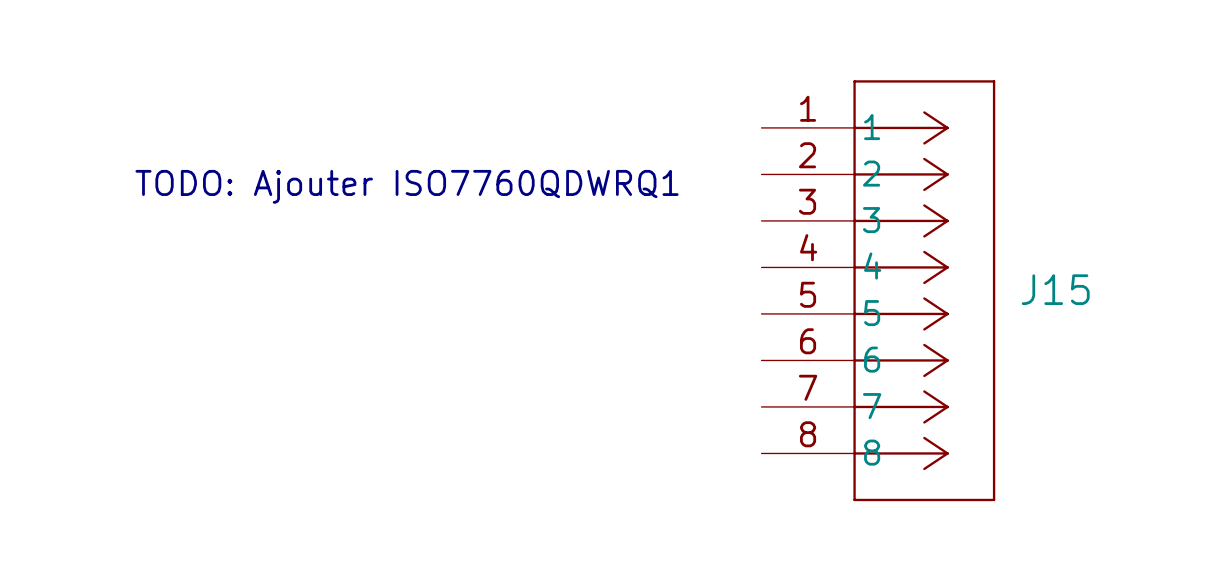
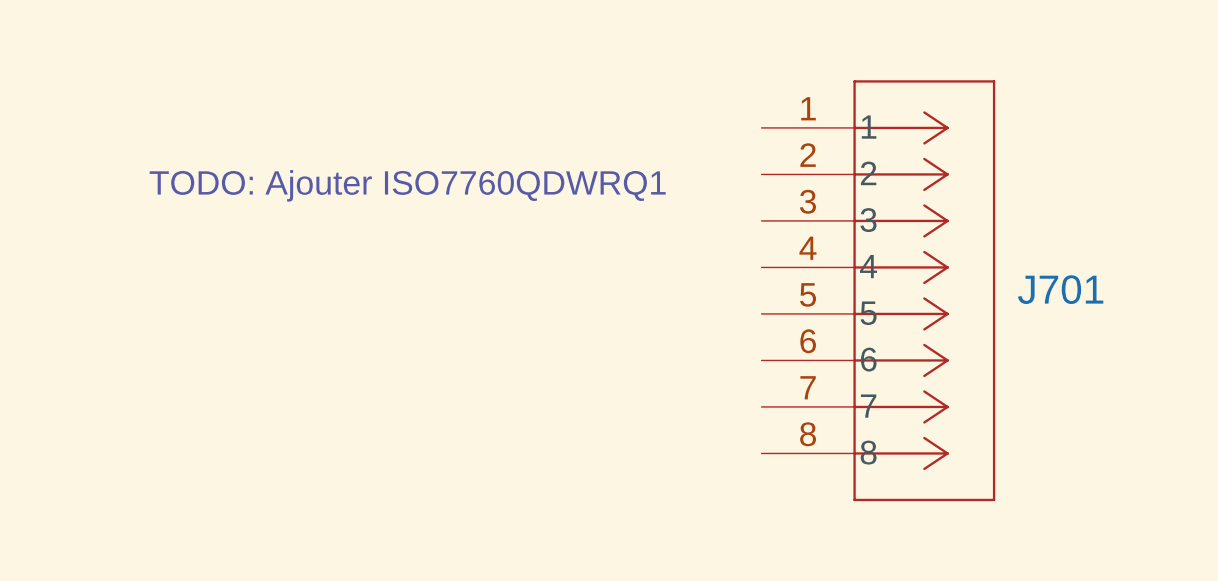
J15 name: J15 (1055, 289) -> J701 (1060, 289)

